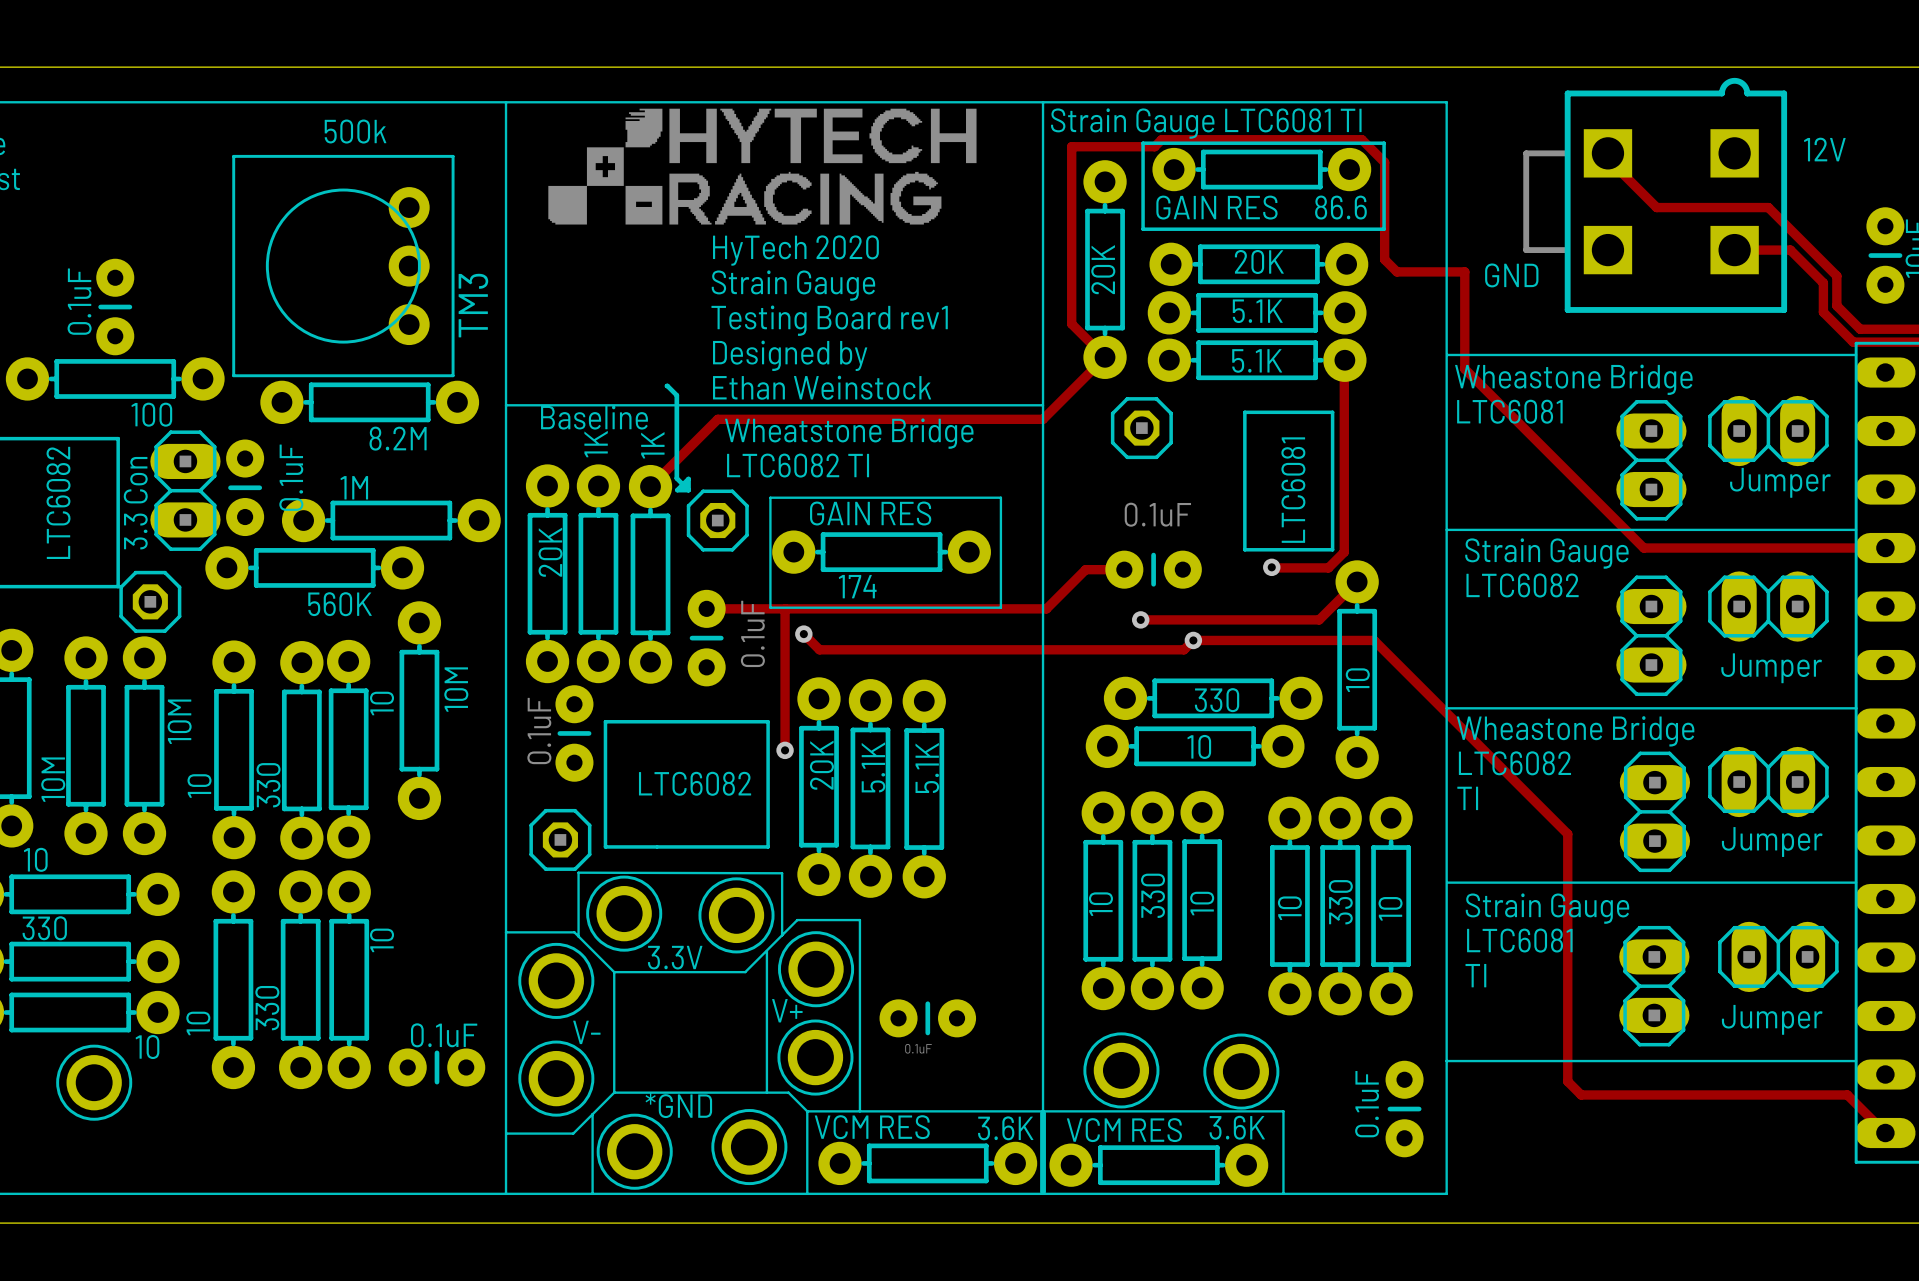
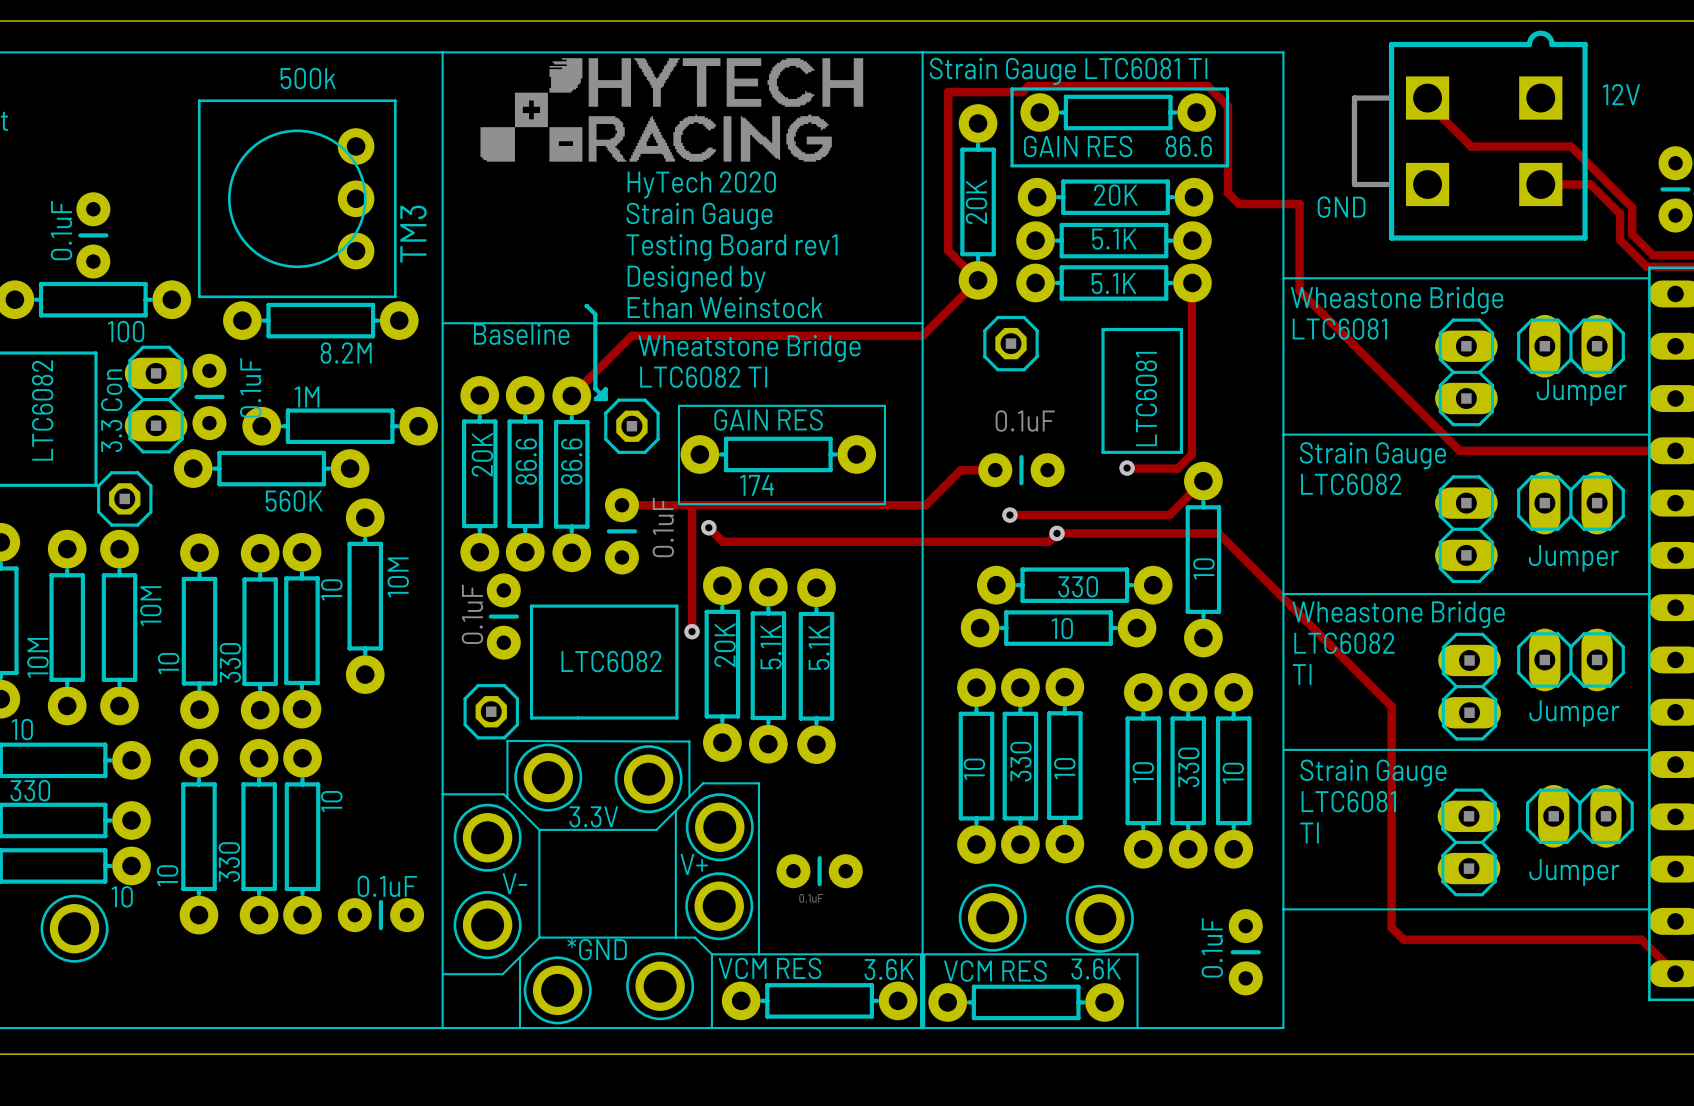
part value: 1K (596, 444) -> 86.6 (526, 461)
part value: 1K (652, 445) -> 86.6 (571, 461)

